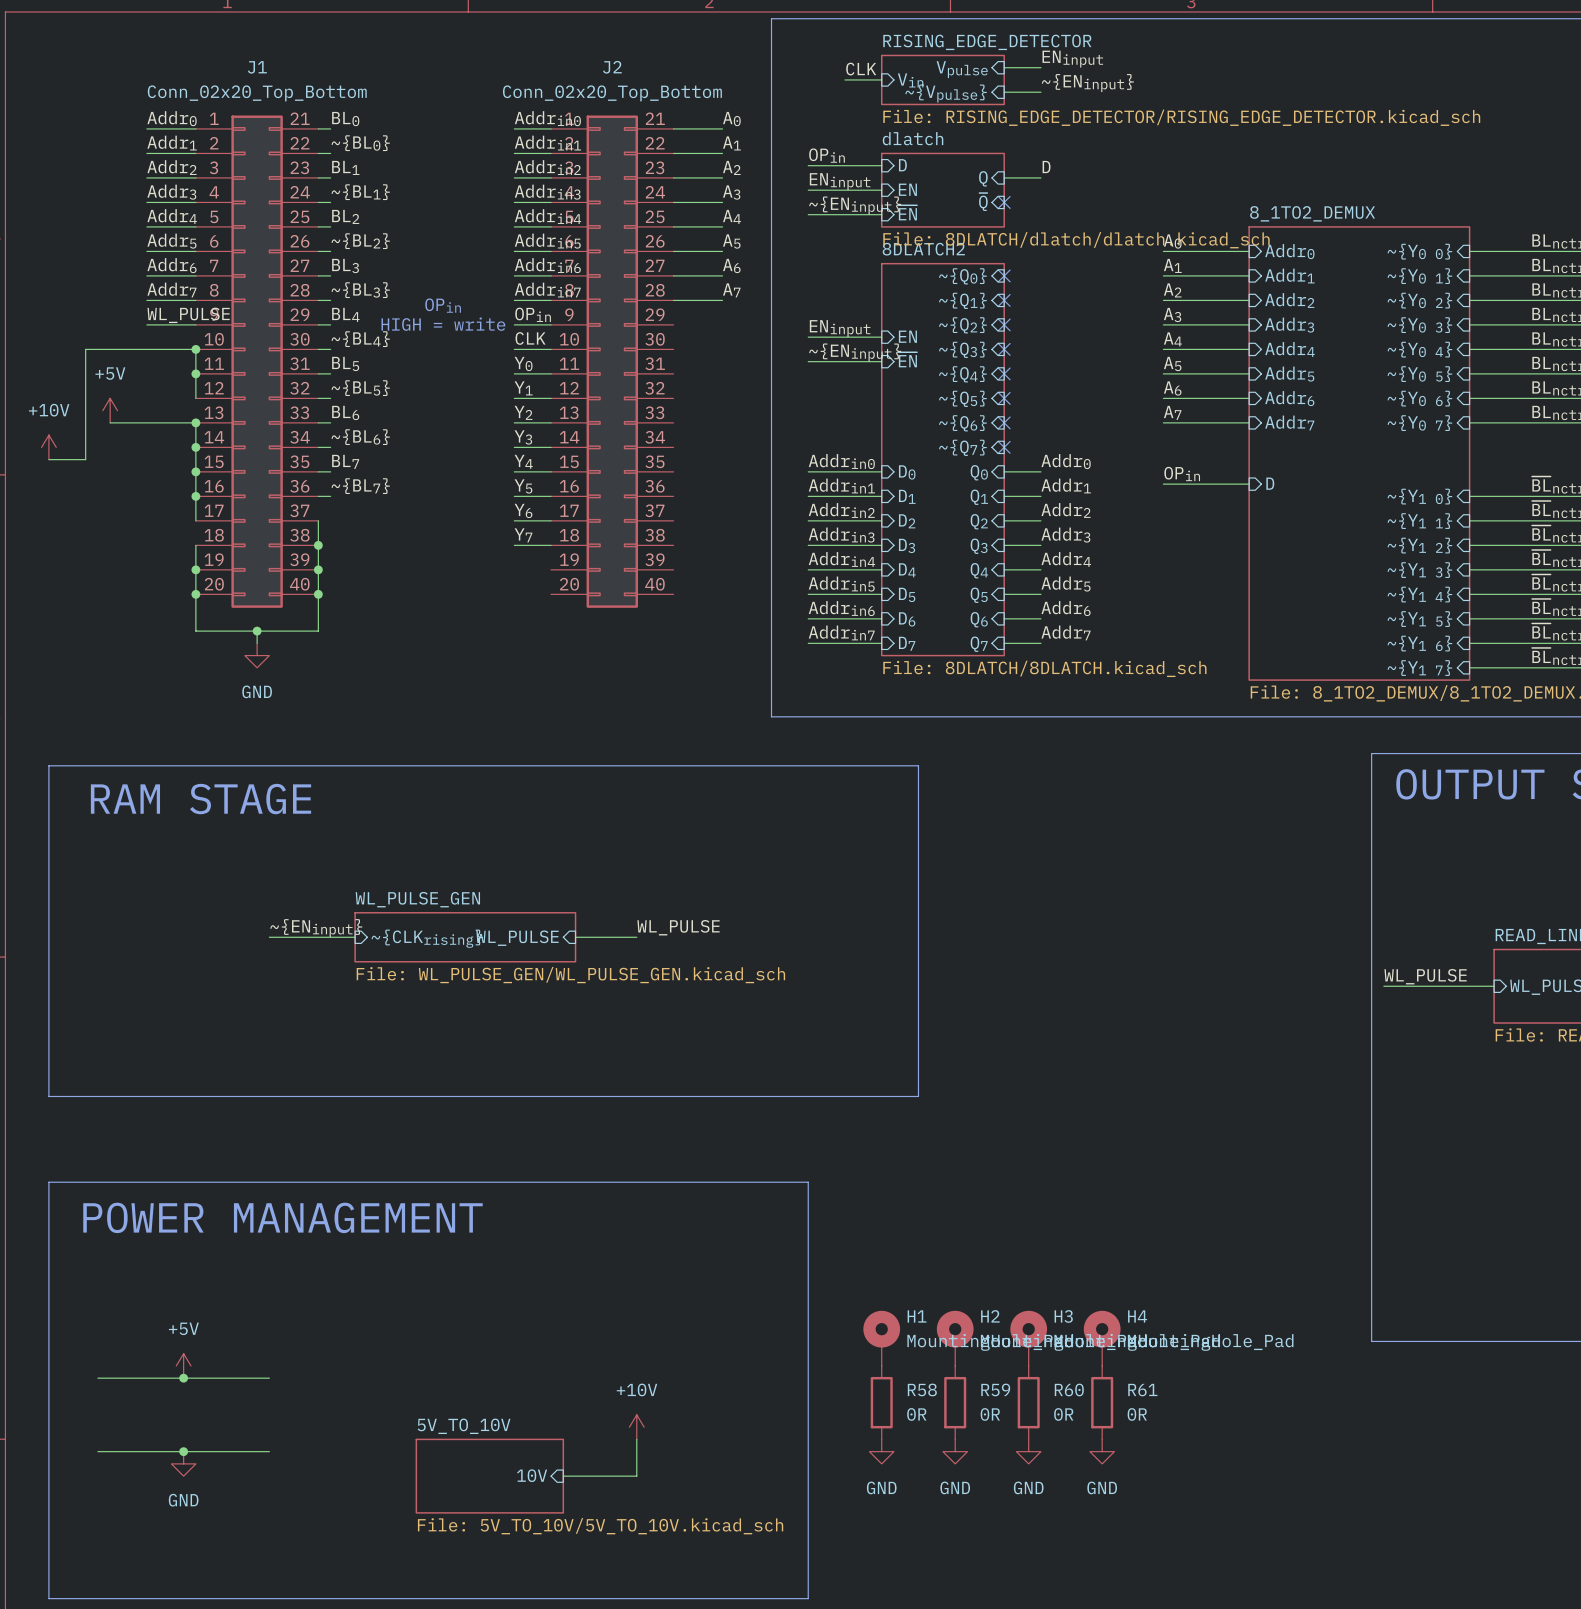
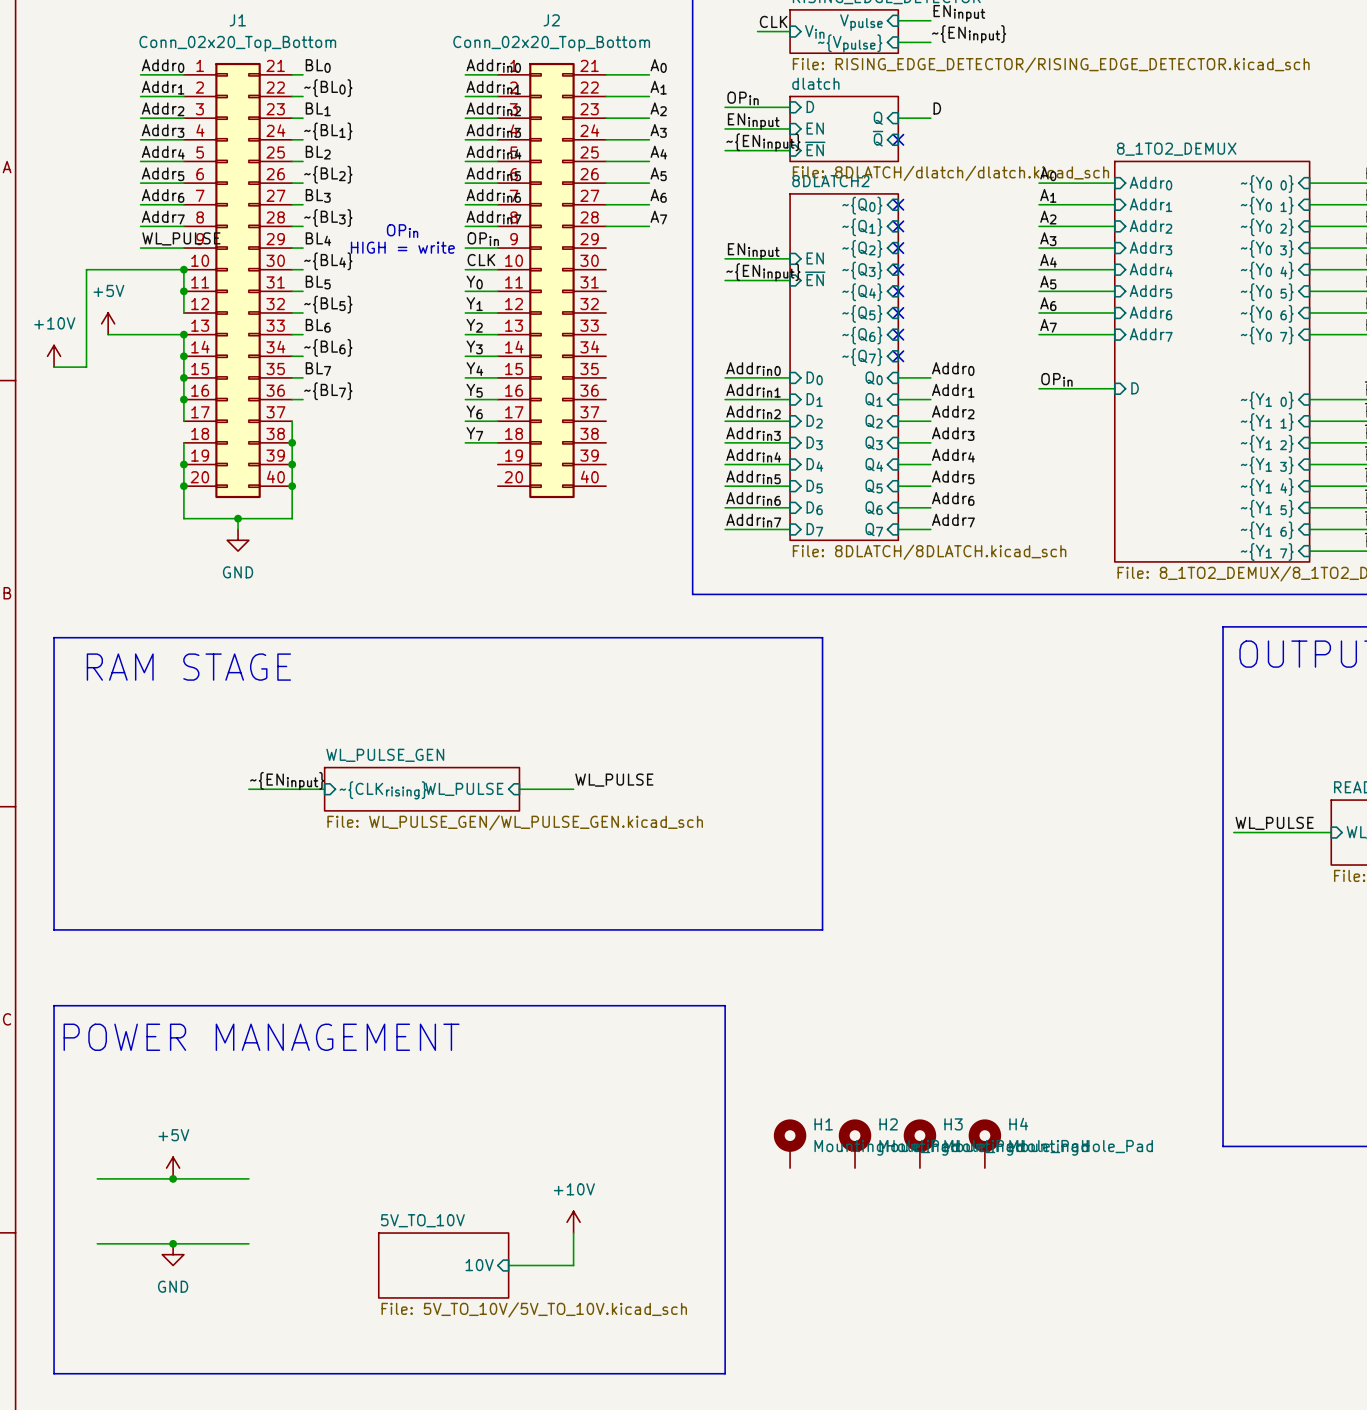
R58: 0R (881, 1402) -> none
R59: 0R (955, 1402) -> none
R60: 0R (1028, 1402) -> none
R61: 0R (1102, 1402) -> none
power symbol: GND (881, 1451) -> none
power symbol: GND (955, 1451) -> none
power symbol: GND (1028, 1451) -> none
power symbol: GND (1102, 1451) -> none

